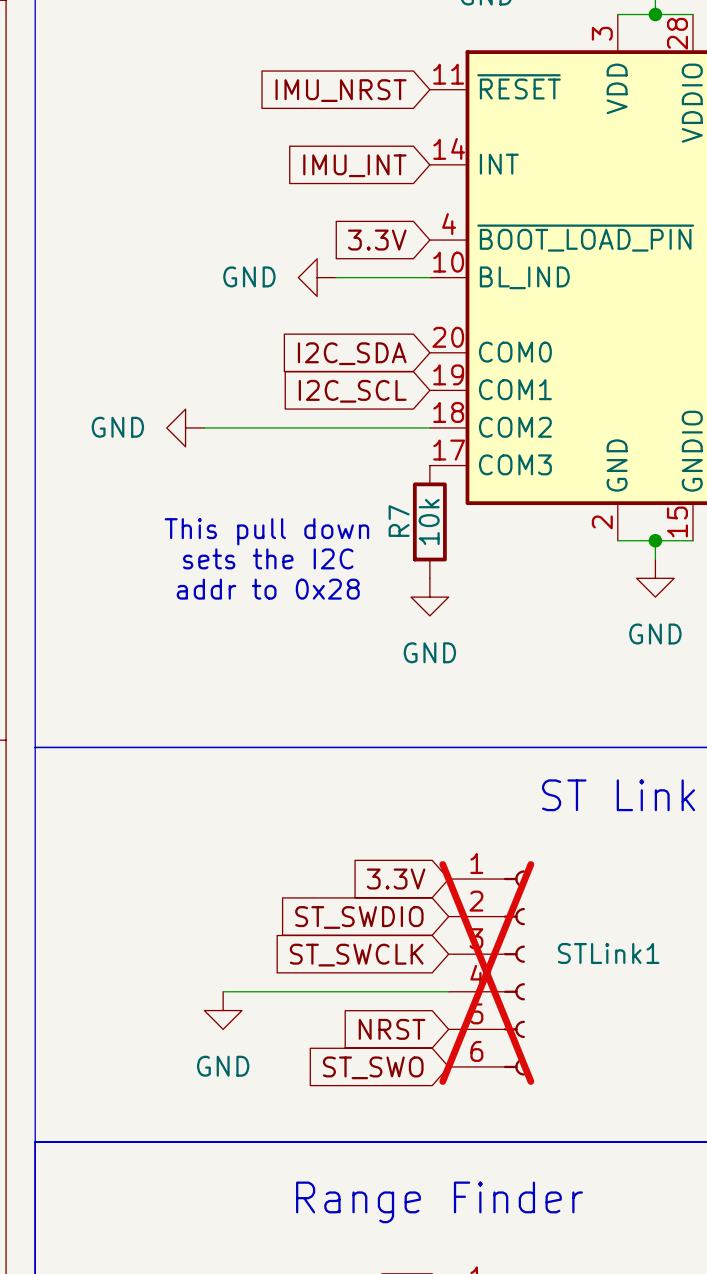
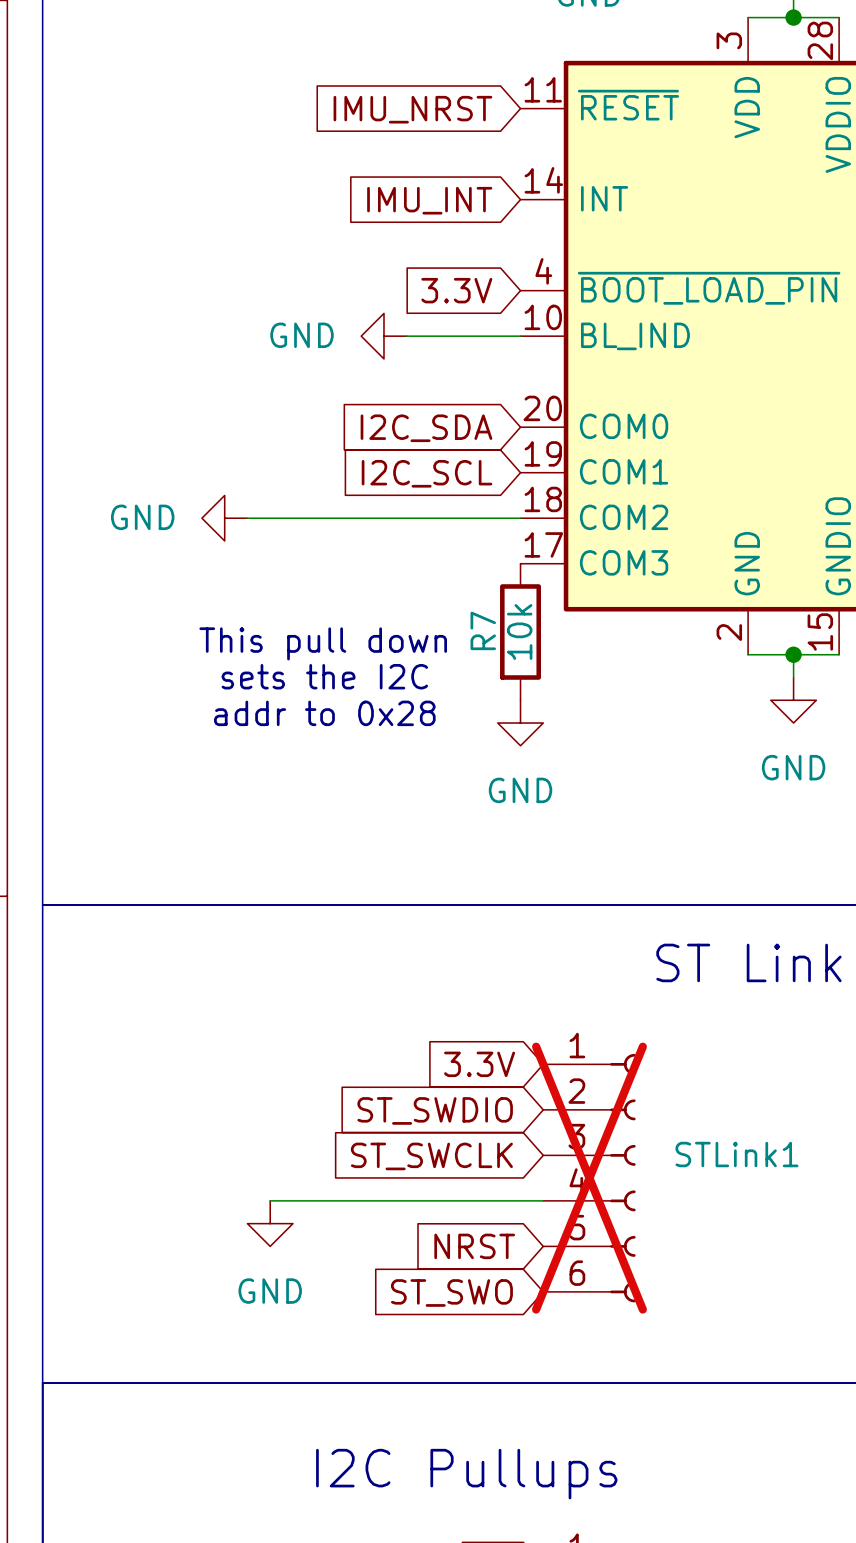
text: Range Finder (439, 1202) -> none
text: none -> I2C Pullups (466, 1474)

